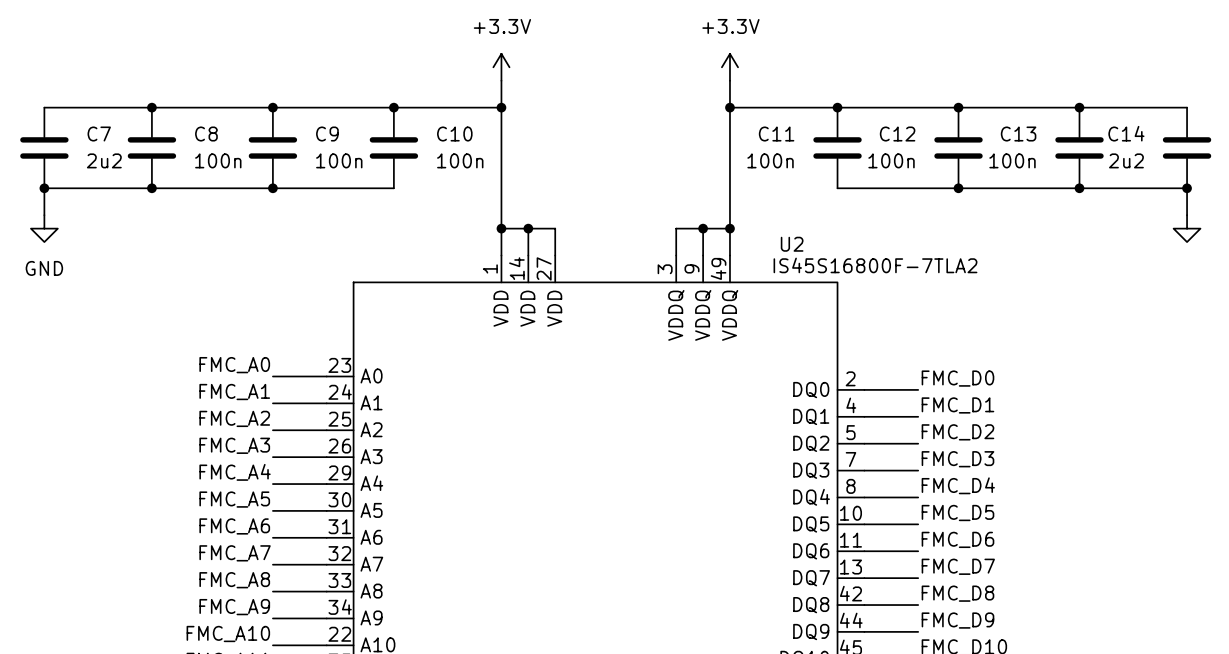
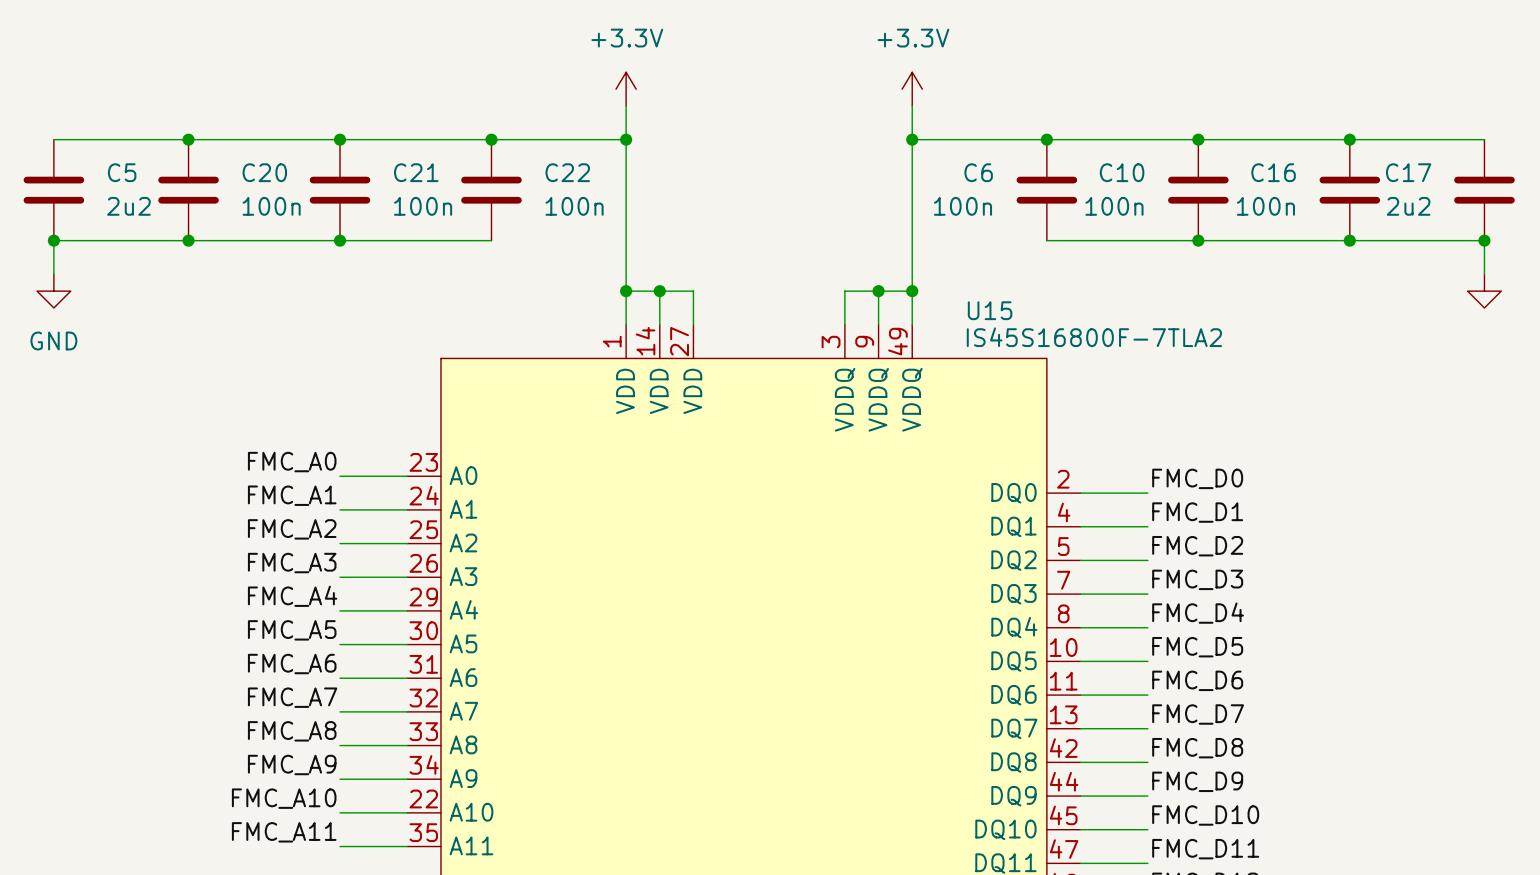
C14 name: C14 (1126, 133) -> C17 (1408, 172)
C7 name: C7 (99, 134) -> C5 (122, 172)
C8 name: C8 (206, 134) -> C20 (264, 172)
C9 name: C9 (327, 134) -> C21 (416, 172)
C10 name: C10 (454, 134) -> C22 (567, 172)
C11 name: C11 (776, 134) -> C6 (978, 172)
C12 name: C12 (897, 134) -> C10 (1122, 172)
C13 name: C13 (1018, 134) -> C16 (1273, 172)
U2 name: U2 (792, 244) -> U15 (990, 310)

